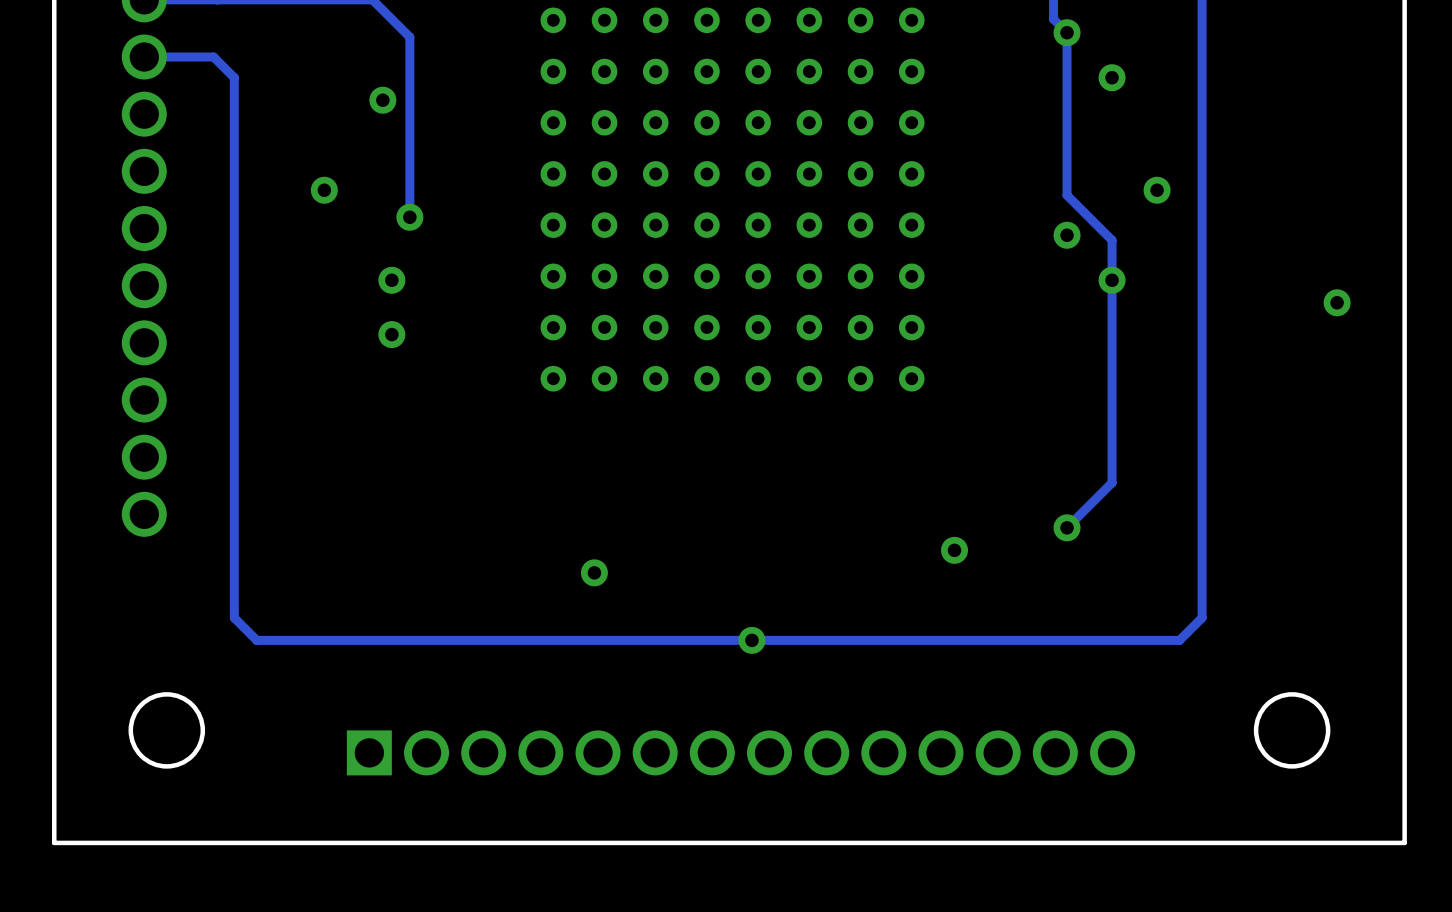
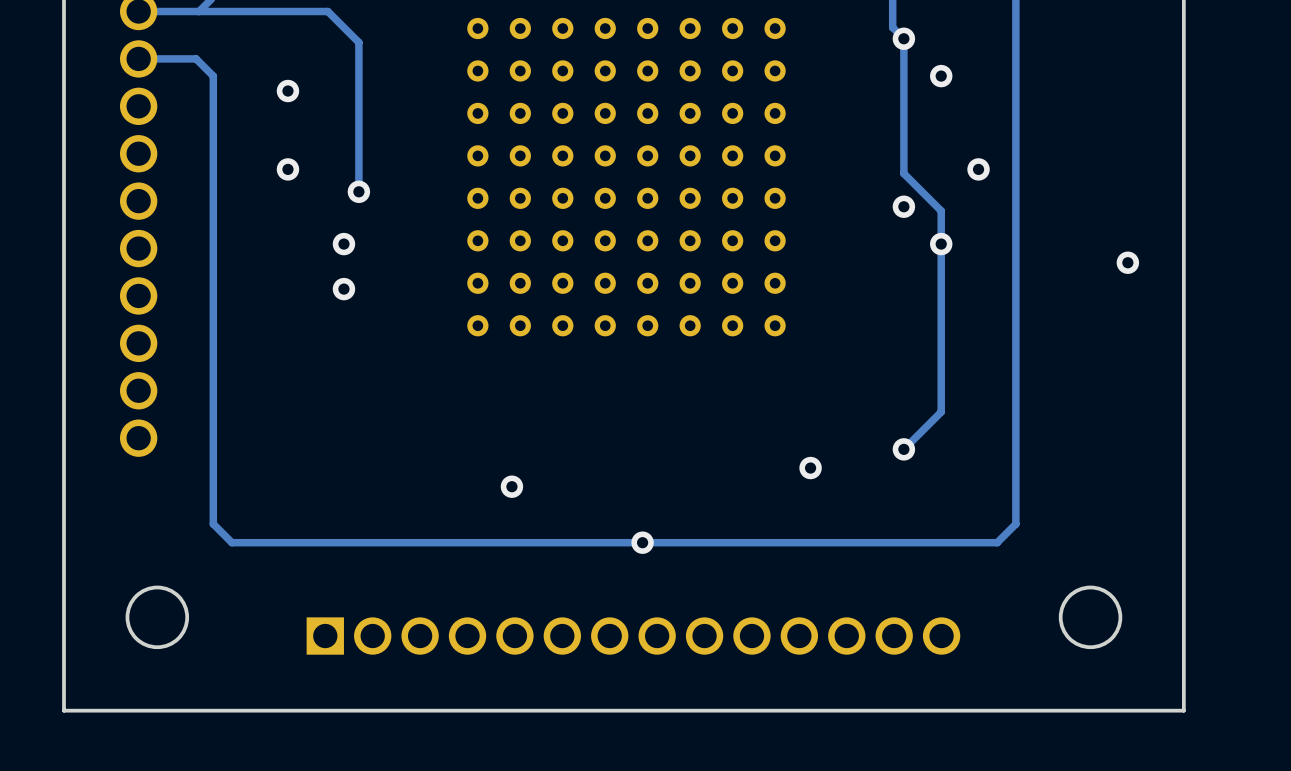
via position: (382, 100) -> (287, 91)

